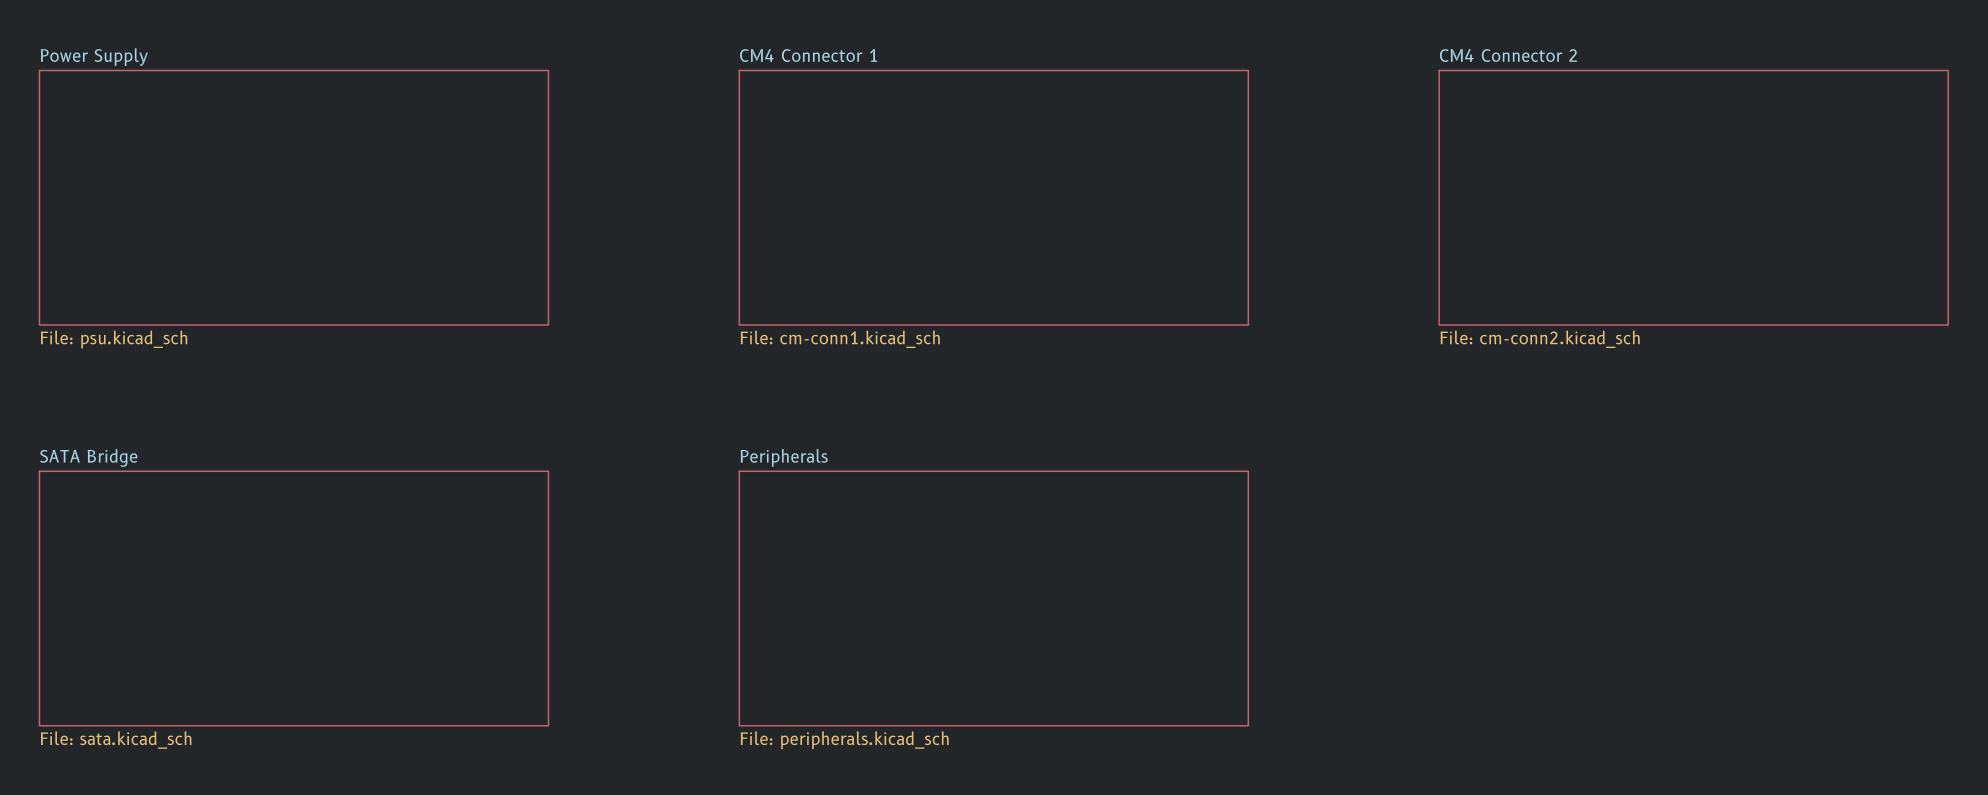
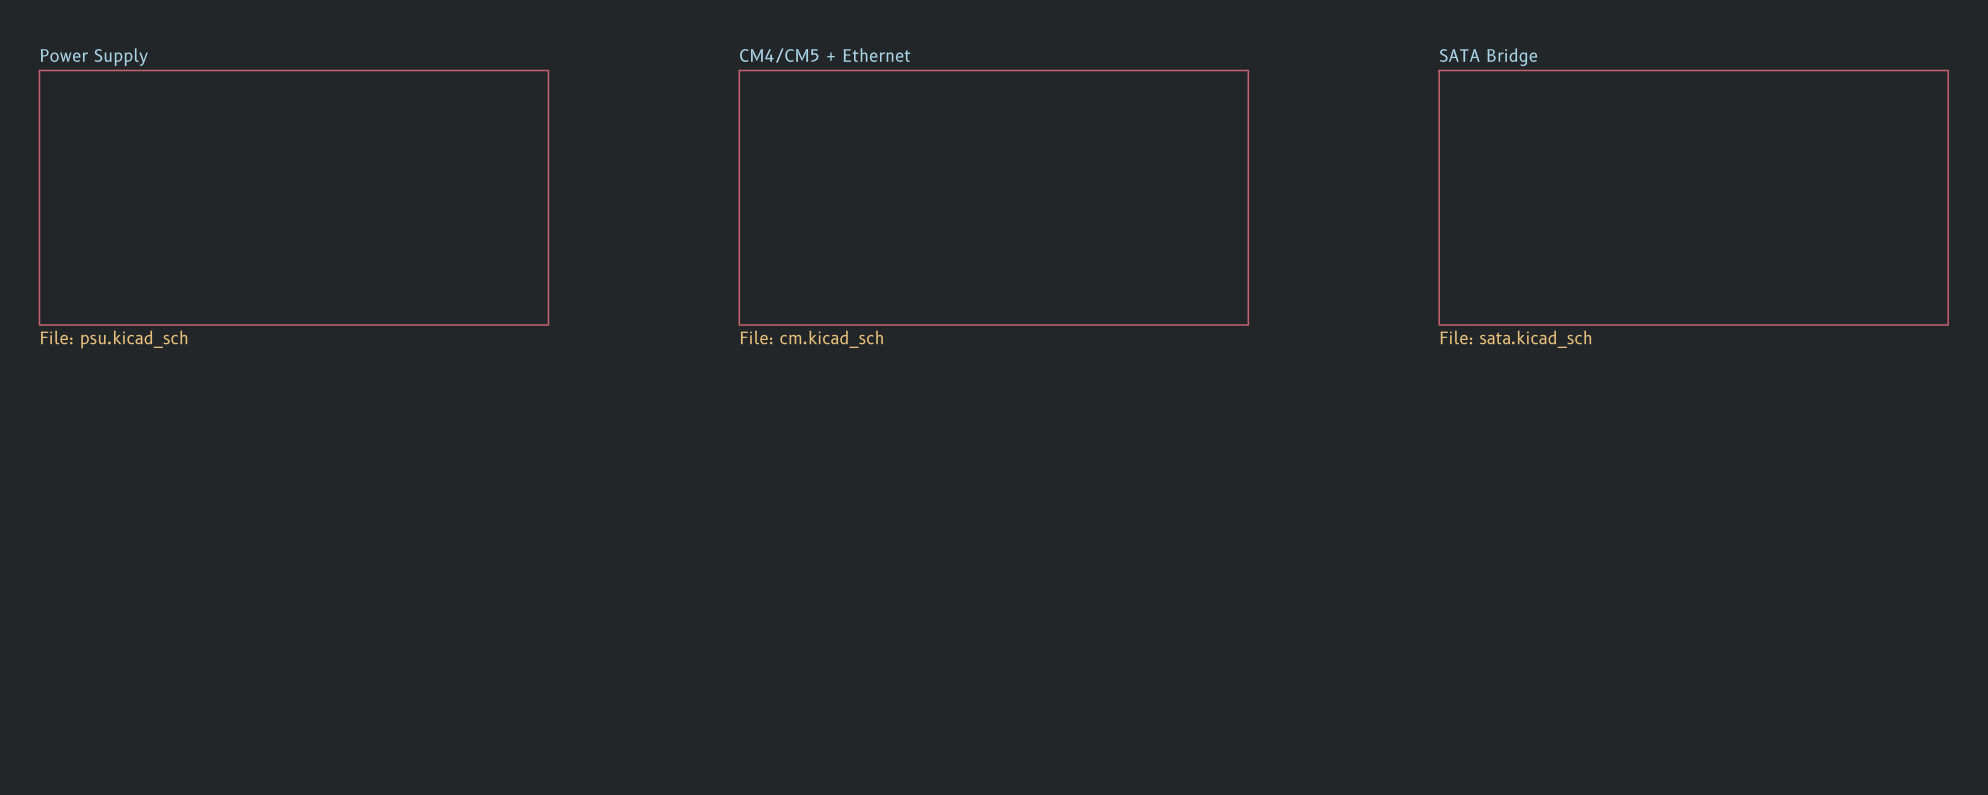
sheet CM4 Connector 1 name: CM4 Connector 1 (808, 55) -> CM4/CM5 + Ethernet (825, 55)
sheet CM4 Connector 2 name: CM4 Connector 2 (1508, 55) -> SATA Bridge (1488, 57)
sheet CM4 Connector 1 value: File: cm-conn1.kicad_sch (840, 339) -> File: cm.kicad_sch (811, 339)
sheet CM4 Connector 2 value: File: cm-conn2.kicad_sch (1540, 339) -> File: sata.kicad_sch (1515, 339)
sheet SATA Bridge: File: sata.kicad_sch (293, 598) -> none
sheet Peripherals: File: peripherals.kicad_sch (993, 598) -> none

